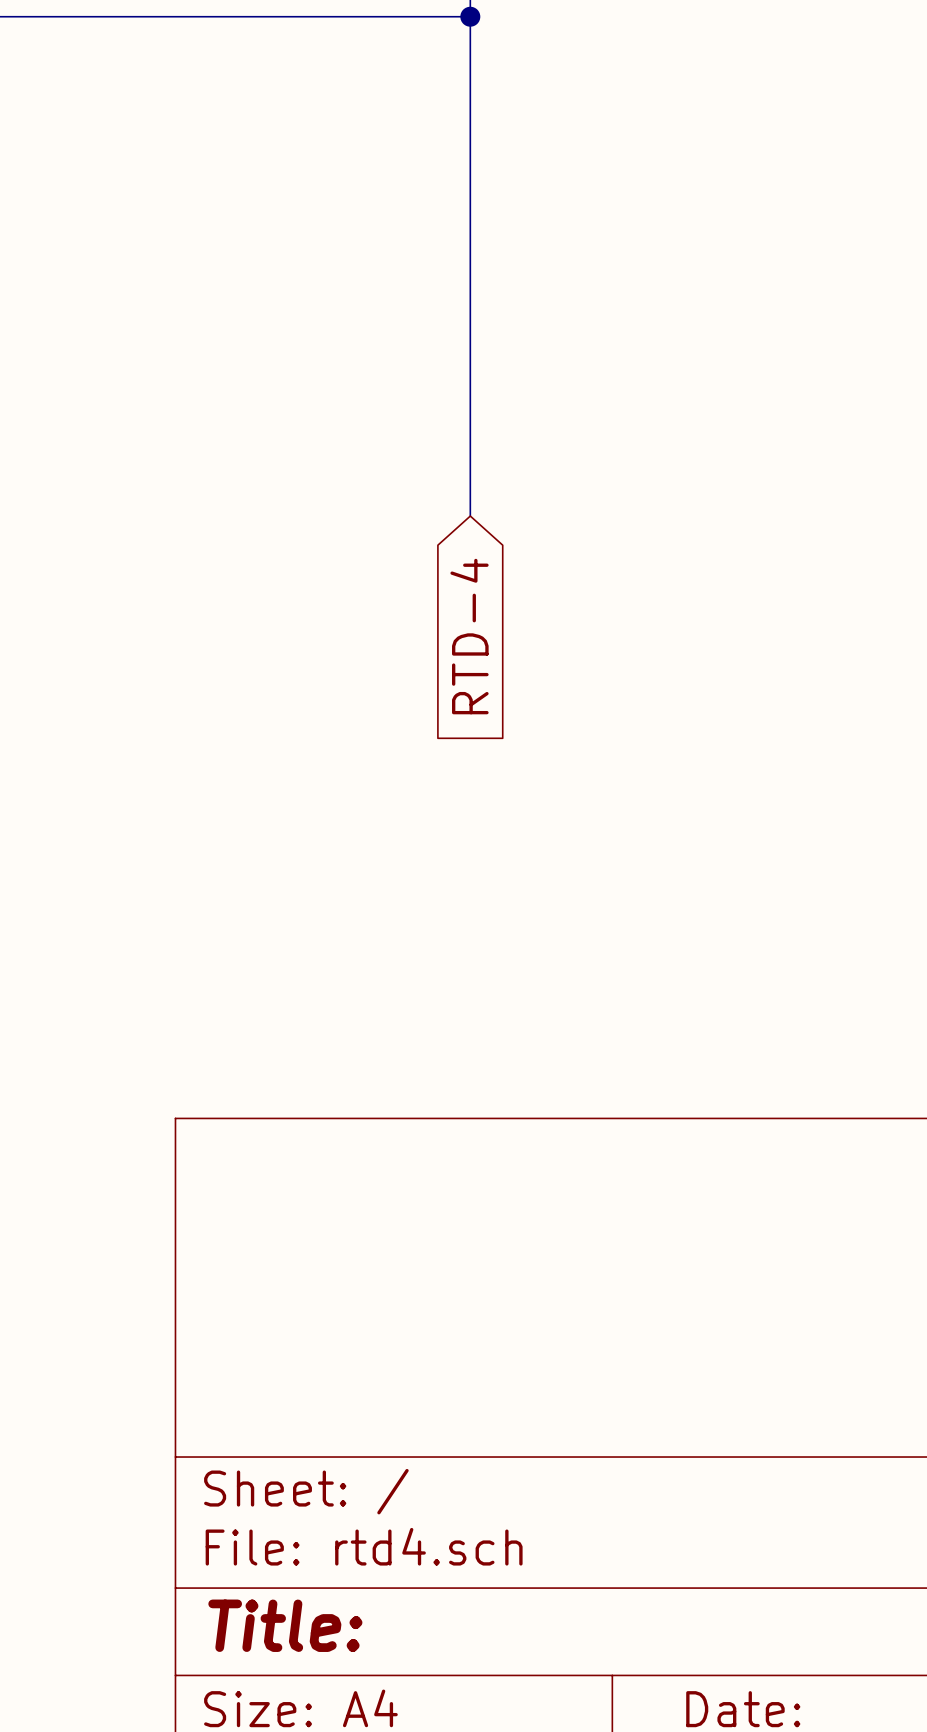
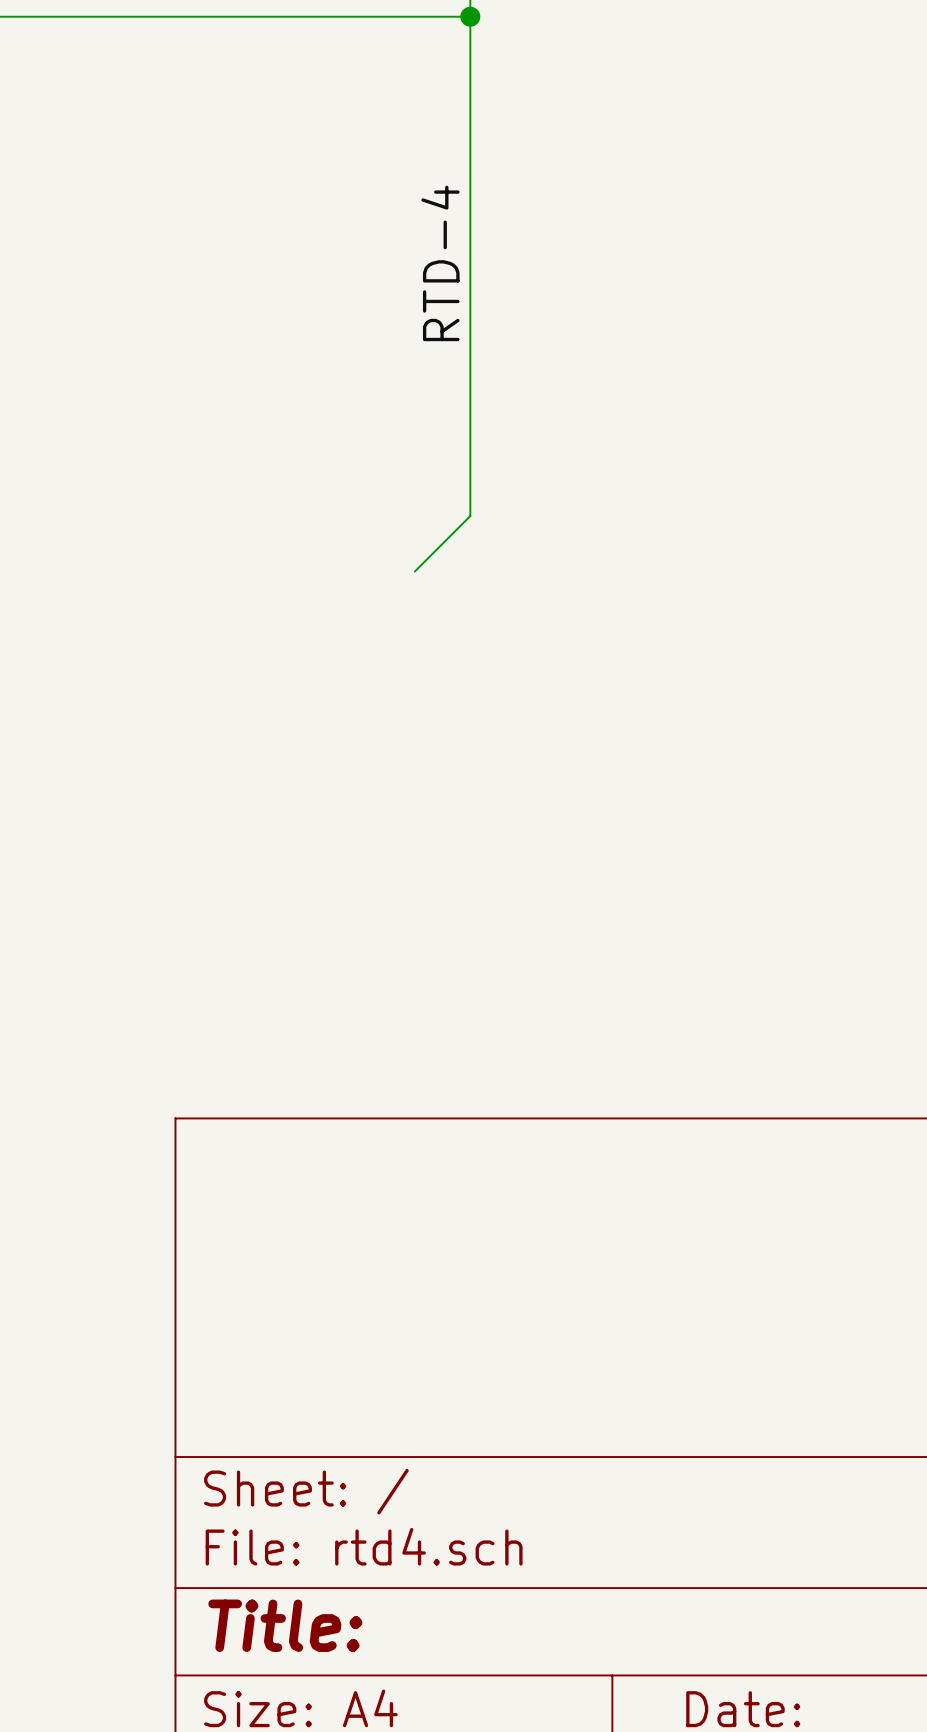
label: none -> RTD-4 (440, 263)
wire: none -> (470, 516) (414, 571)
global label: RTD-4 (469, 636) -> none

